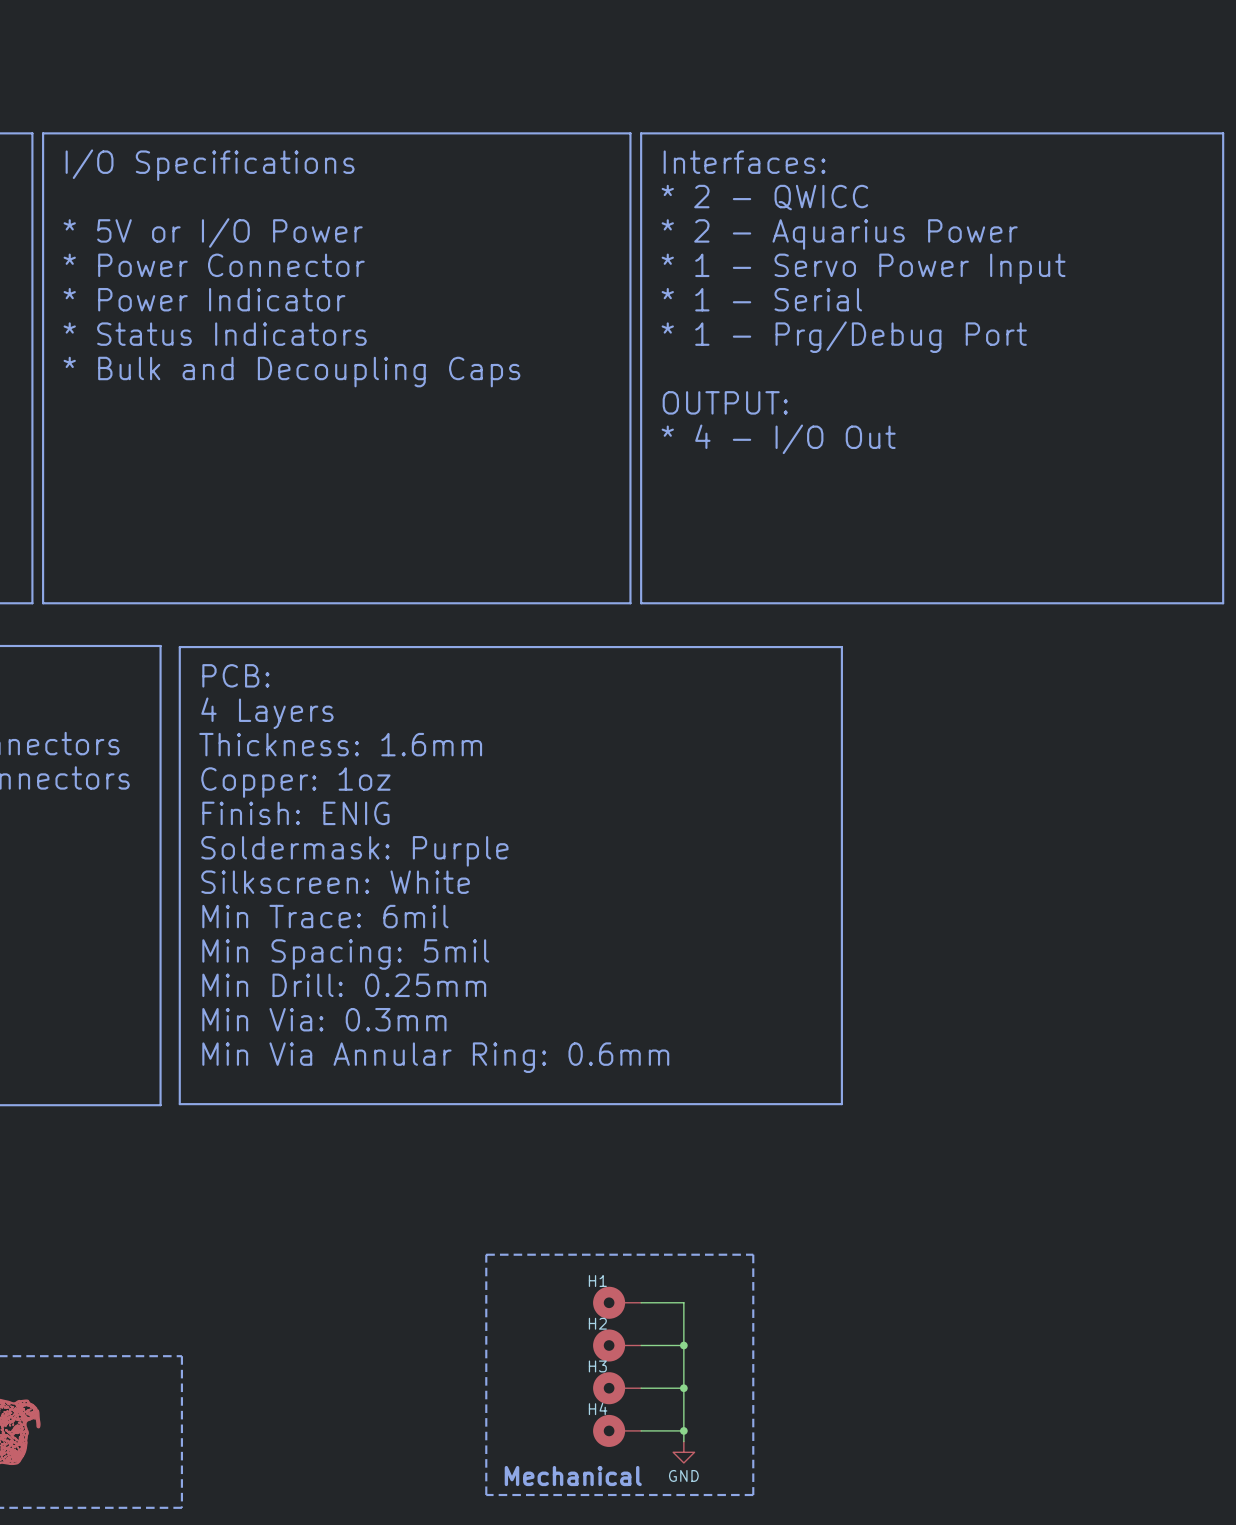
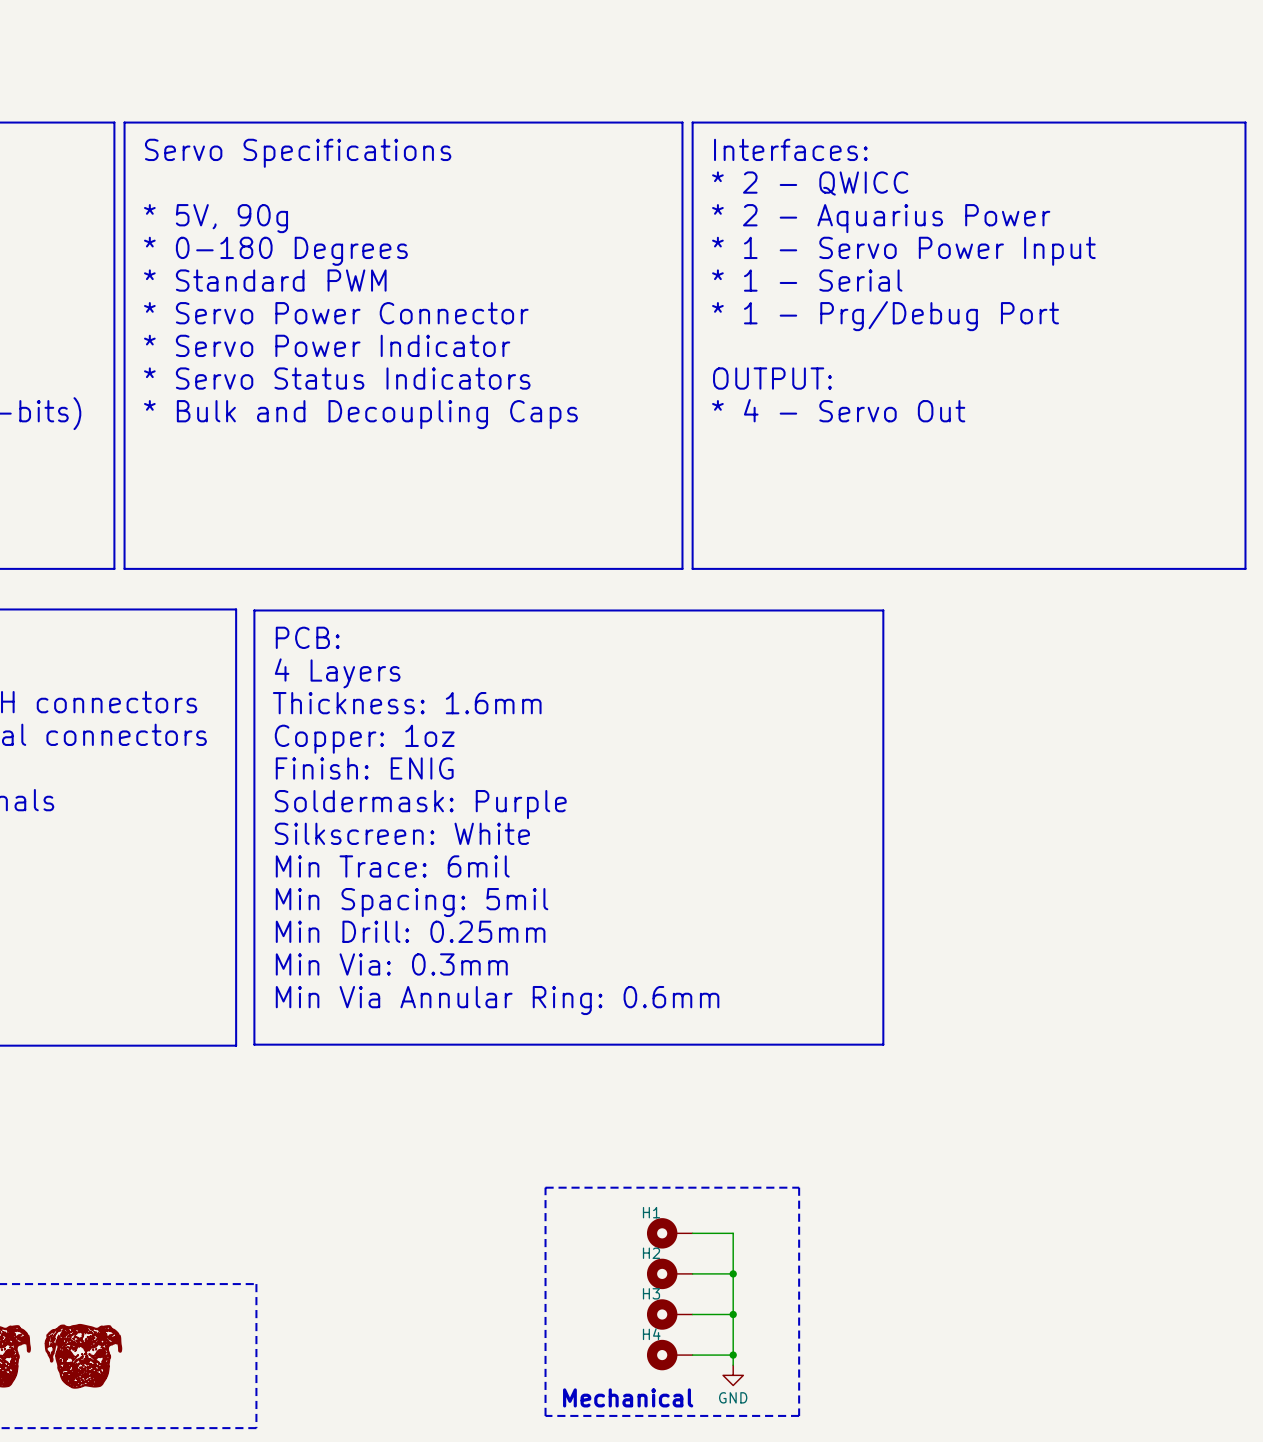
text: I/O Specifications (210, 165) -> Servo Specifications (298, 153)
text: * 5V or I/O Power (213, 232) -> * 5V, 90g (216, 218)
text: * Power Connector (214, 265) -> * 0-180 Degrees (275, 251)
text: * Power Indicator (204, 299) -> * Standard PWM (265, 280)
text: * Status Indicators (215, 334) -> * Servo Power Connector (336, 313)
text: * Bulk and Decoupling Caps (291, 372) -> * Servo Power Indicator (327, 345)
text: none -> * Servo Status Indicators (337, 378)
text: * 4 - I/O Out (778, 439) -> * 4 - Servo Out (838, 410)
text: none -> * Bulk and Decoupling Caps (360, 414)

